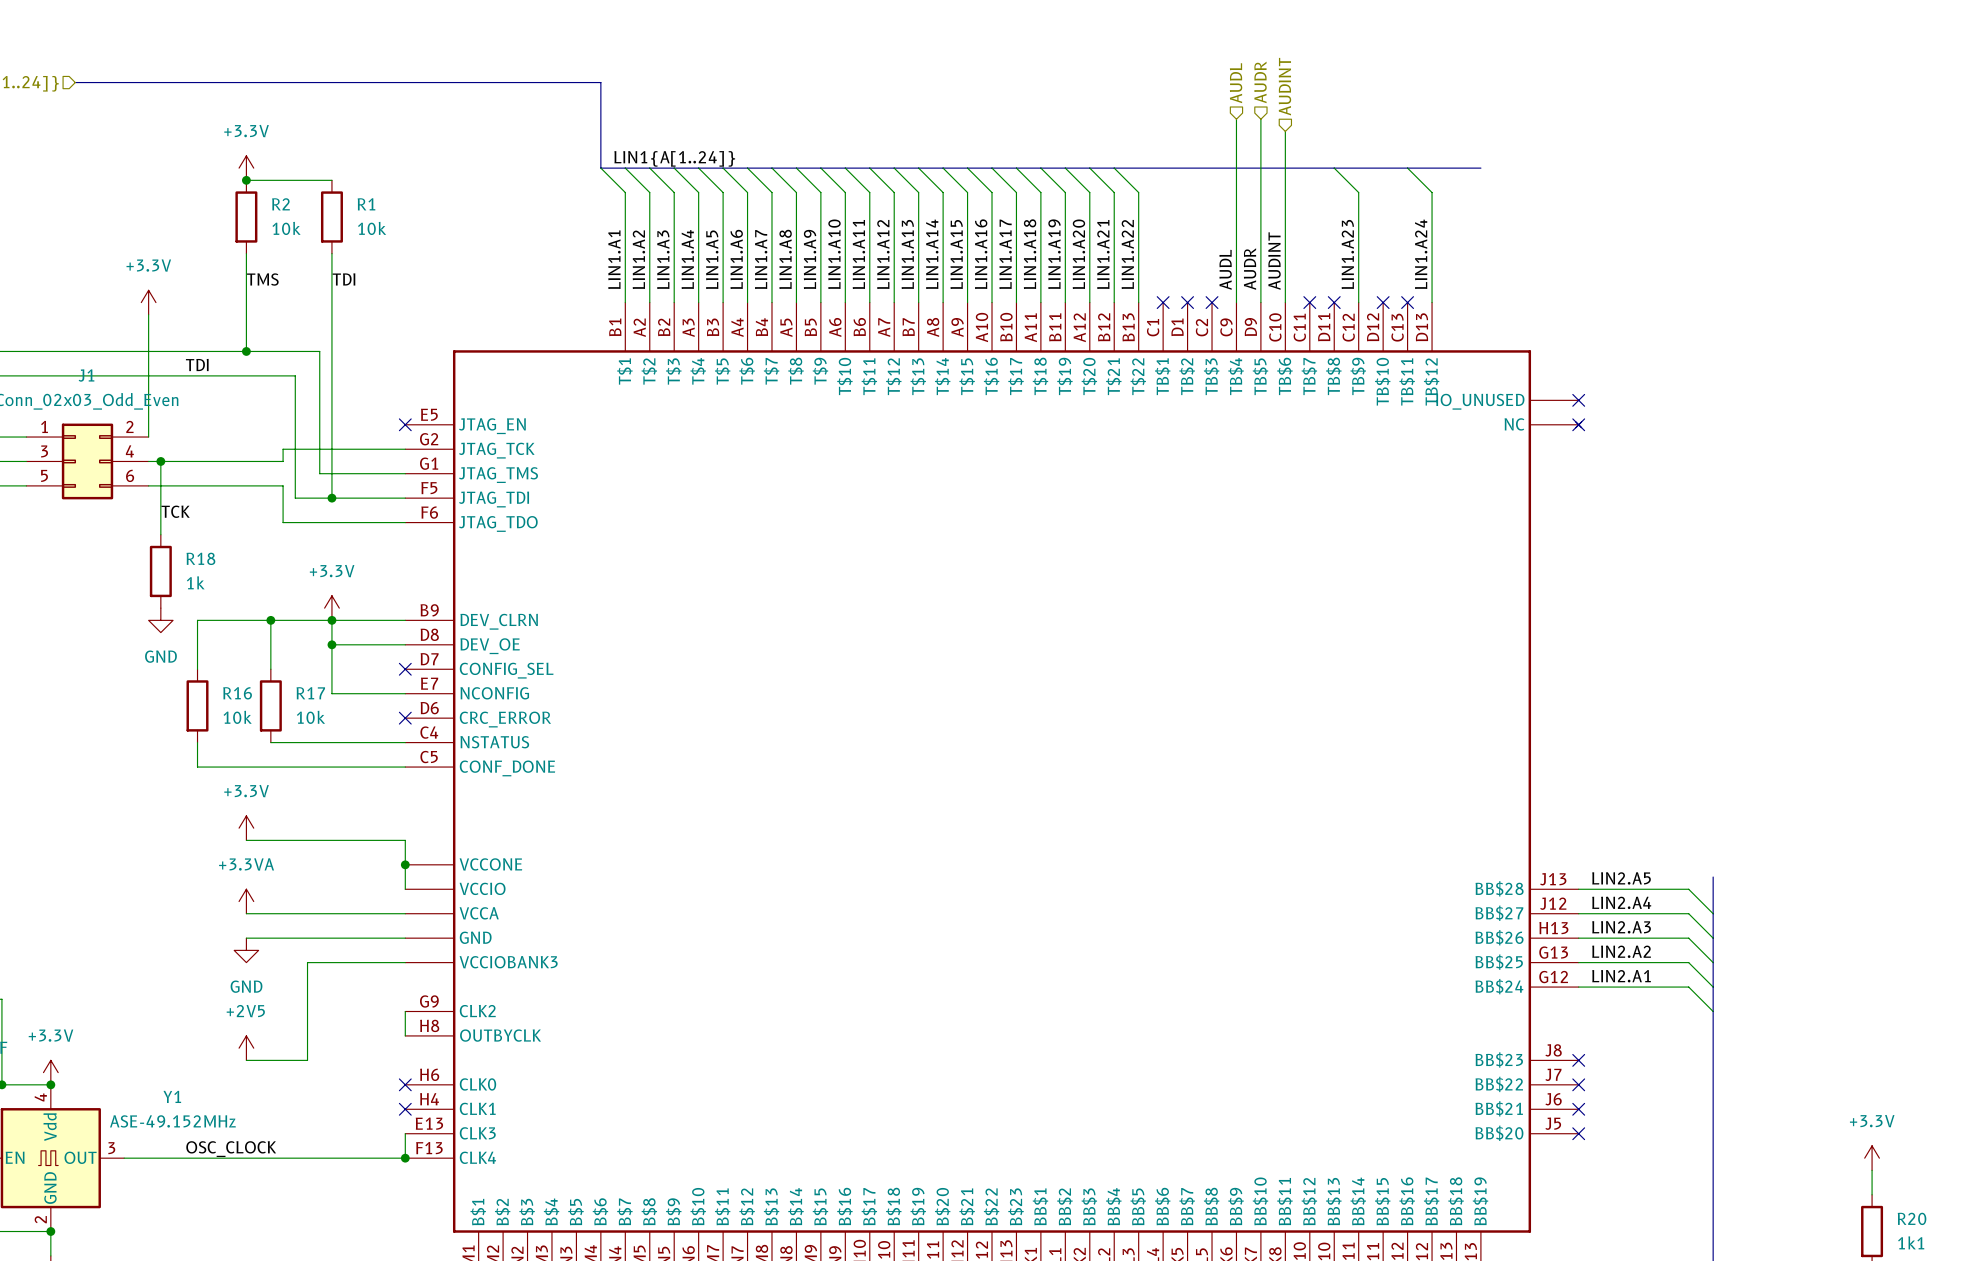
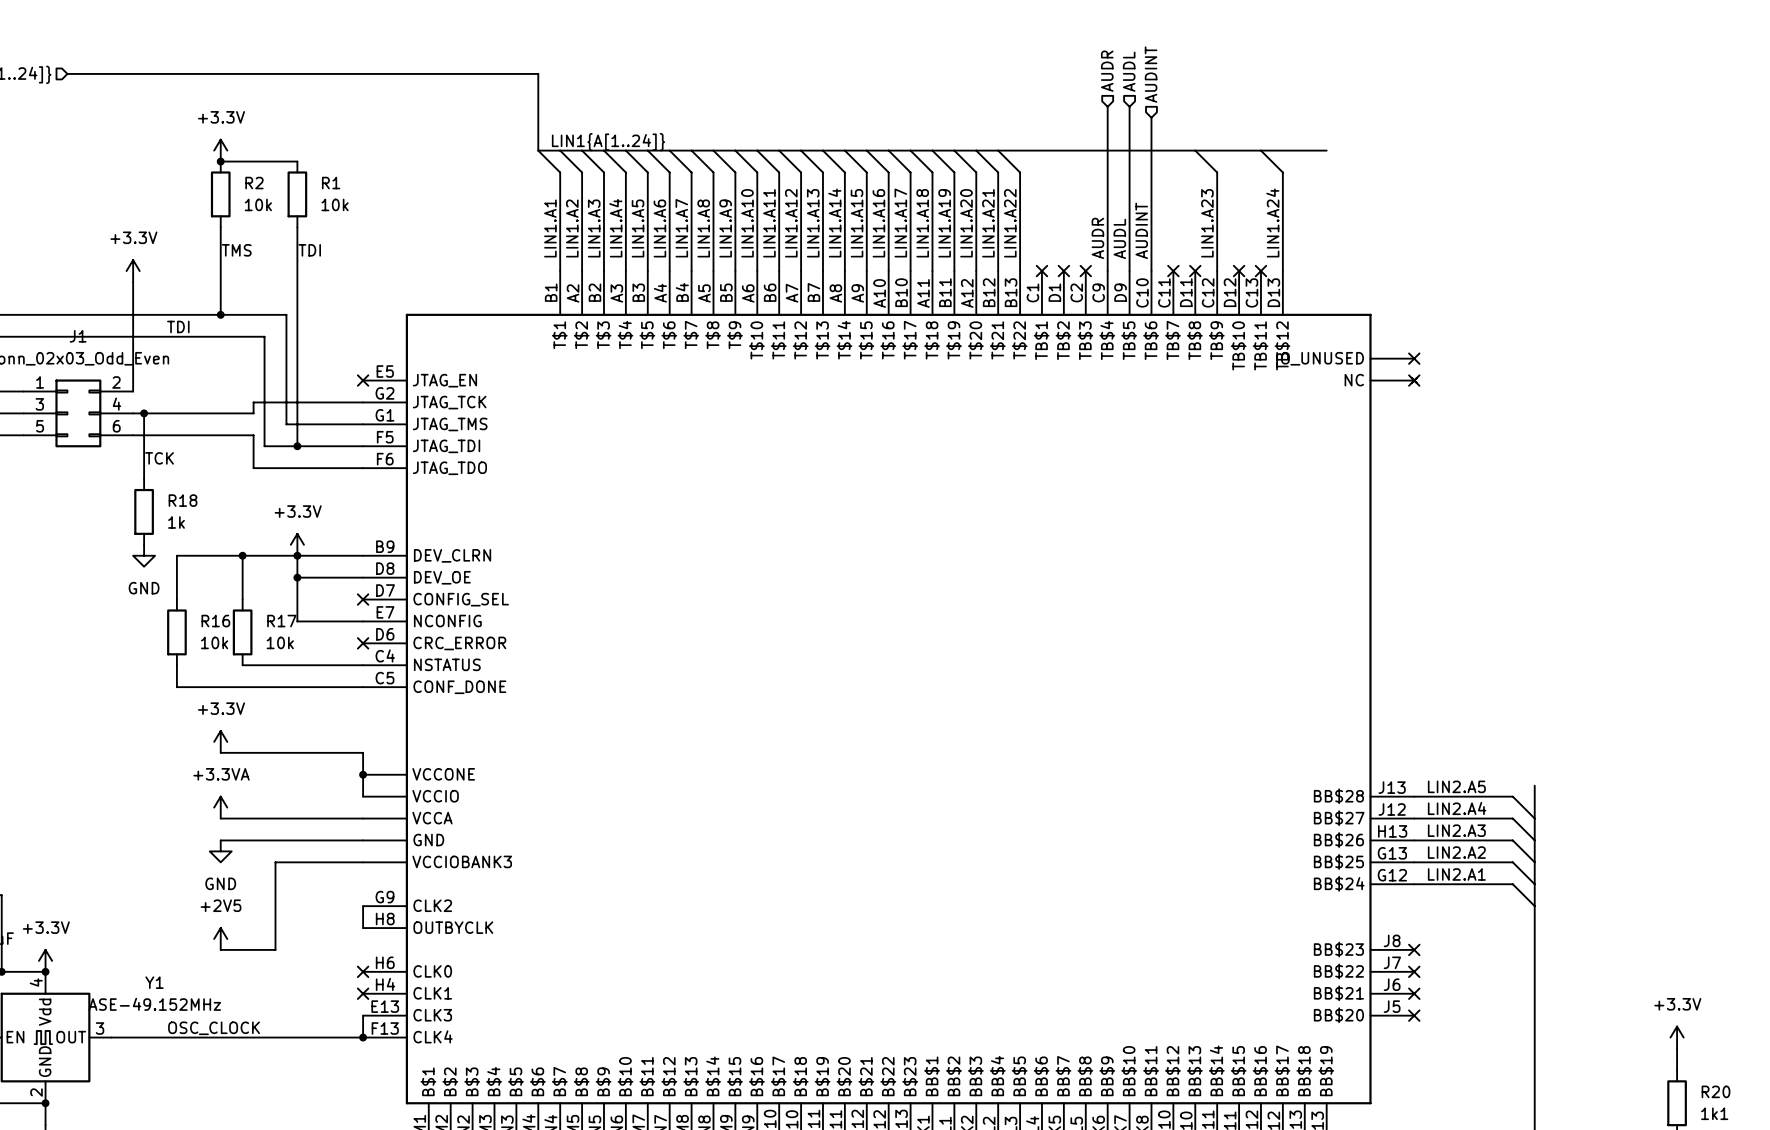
hierarchical label: AUDR (1260, 82) -> AUDL (1129, 71)
hierarchical label: AUDL (1236, 83) -> AUDR (1107, 71)
label: AUDL (1225, 269) -> AUDR (1097, 238)
label: AUDR (1250, 269) -> AUDL (1119, 238)

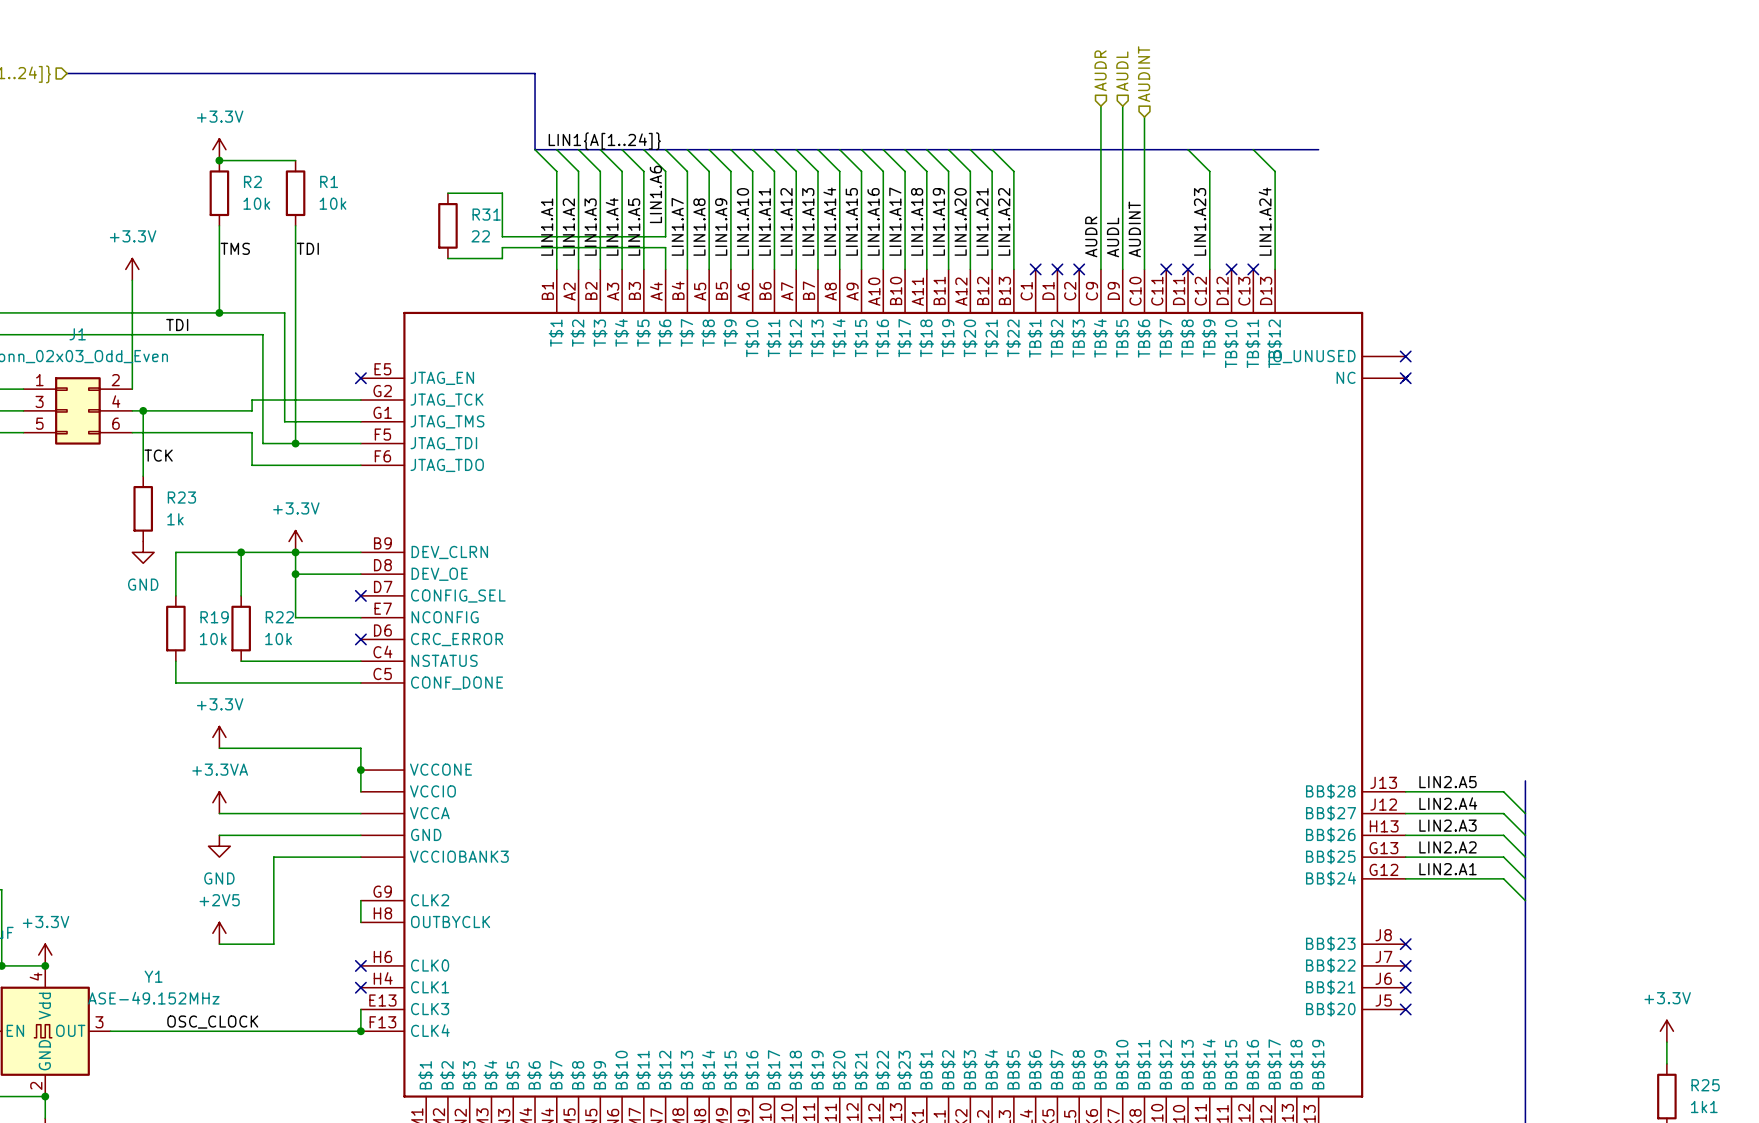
wire: none -> (447, 193) (502, 193) (502, 236) (665, 236)
R31: none -> 22 (447, 225)
label position: LIN1.A6 (659, 228) -> LIN1.A6 (655, 194)
wire: (669, 238) (669, 249) -> (447, 258) (502, 258) (502, 247) (665, 247)
R18 name: R18 (183, 500) -> R23 (181, 497)
R16 name: R16 (215, 621) -> R19 (214, 617)
R17 name: R17 (281, 621) -> R22 (279, 617)
R20 name: R20 (1716, 1091) -> R25 (1705, 1085)

